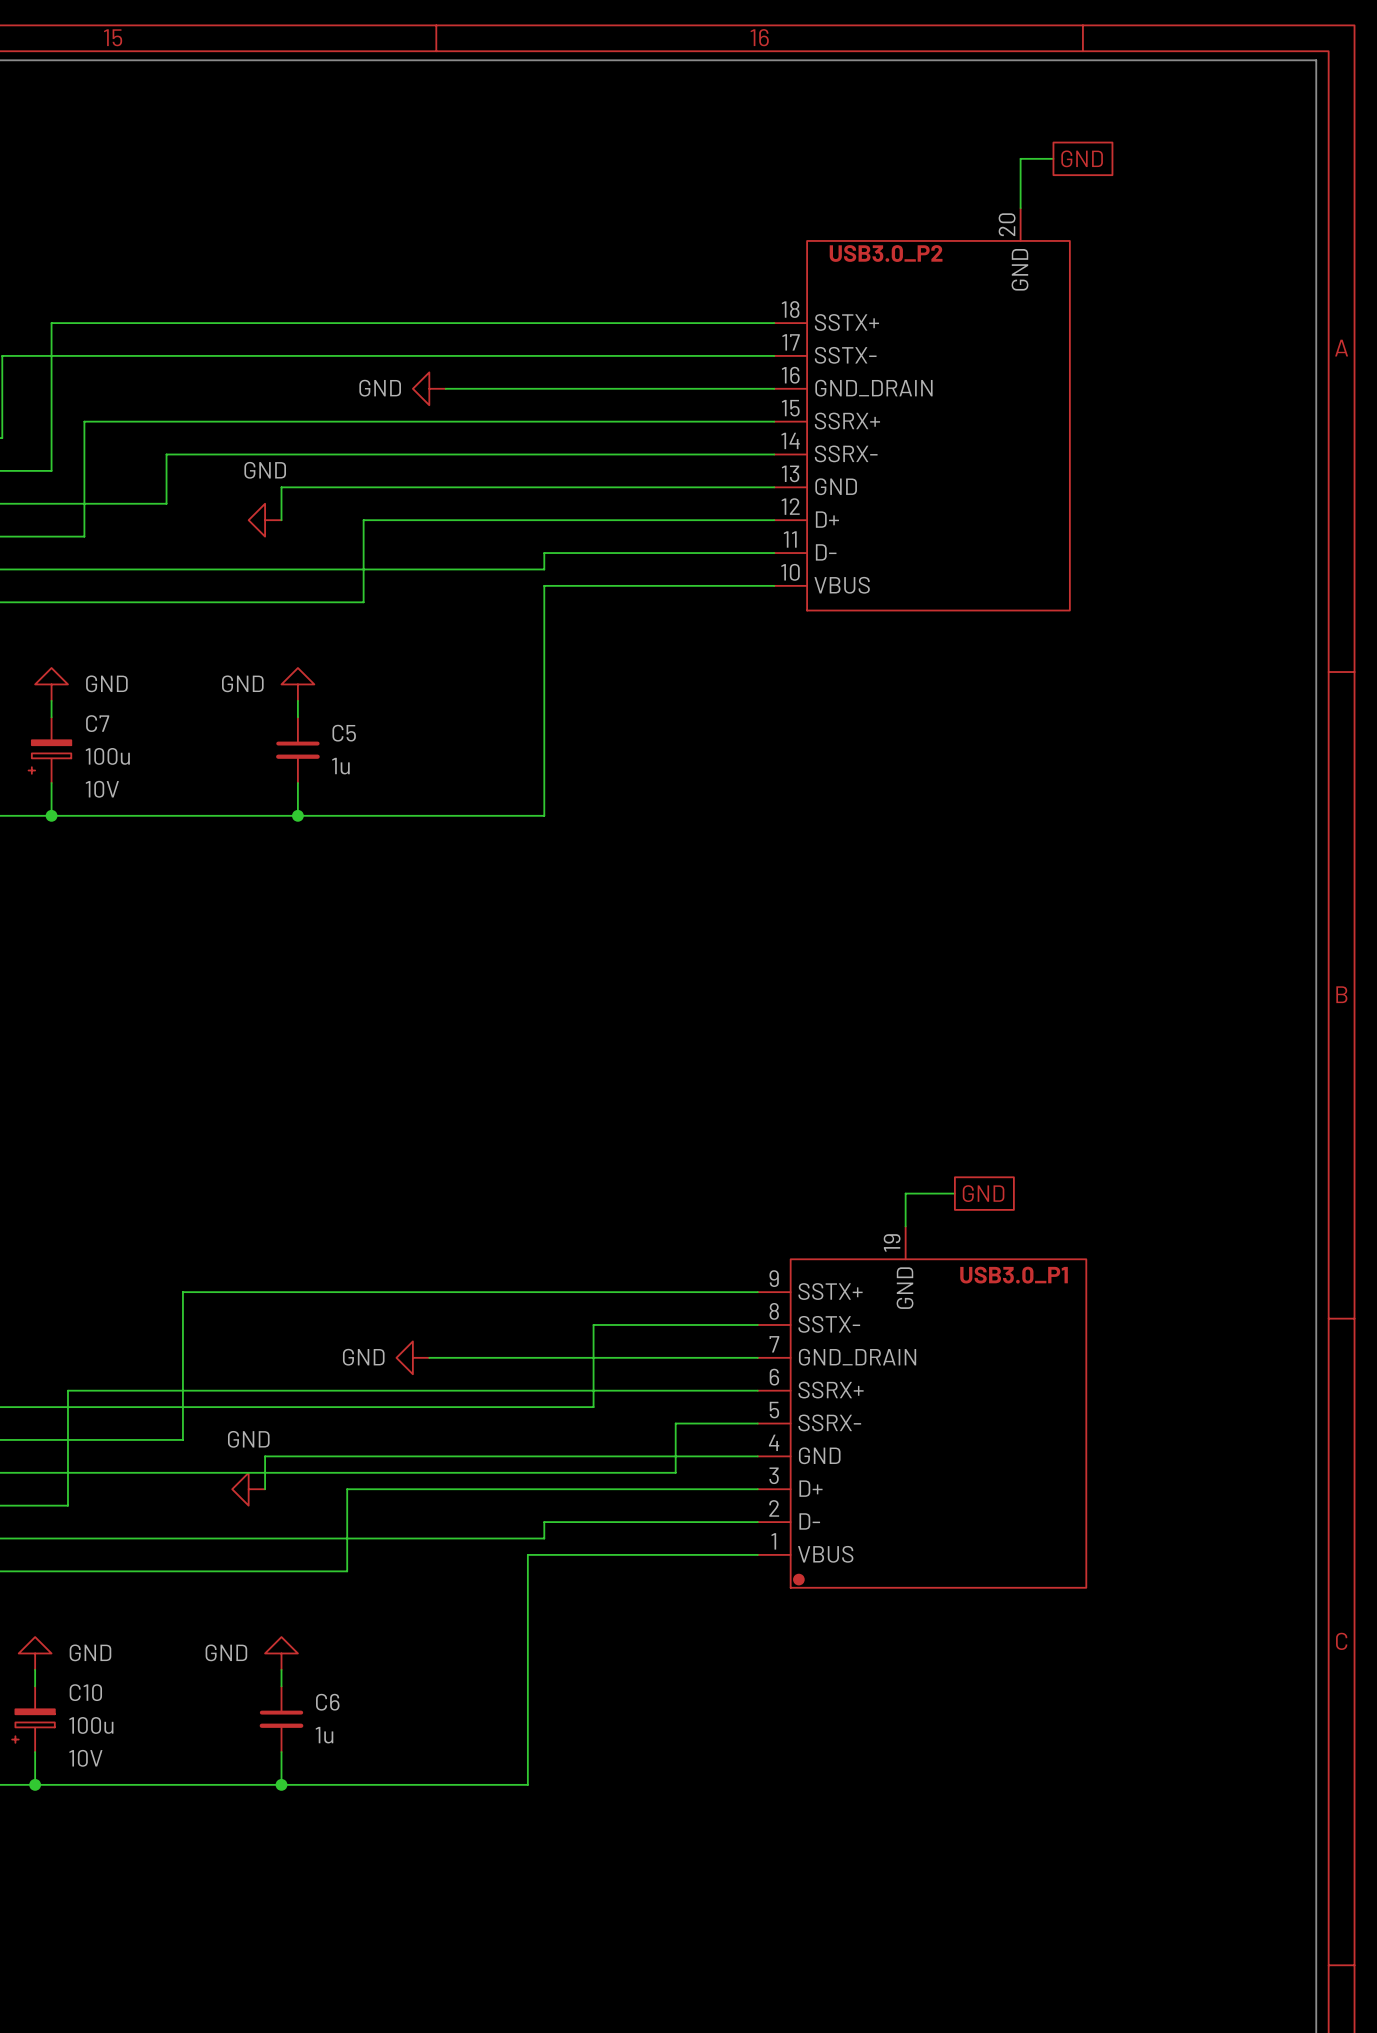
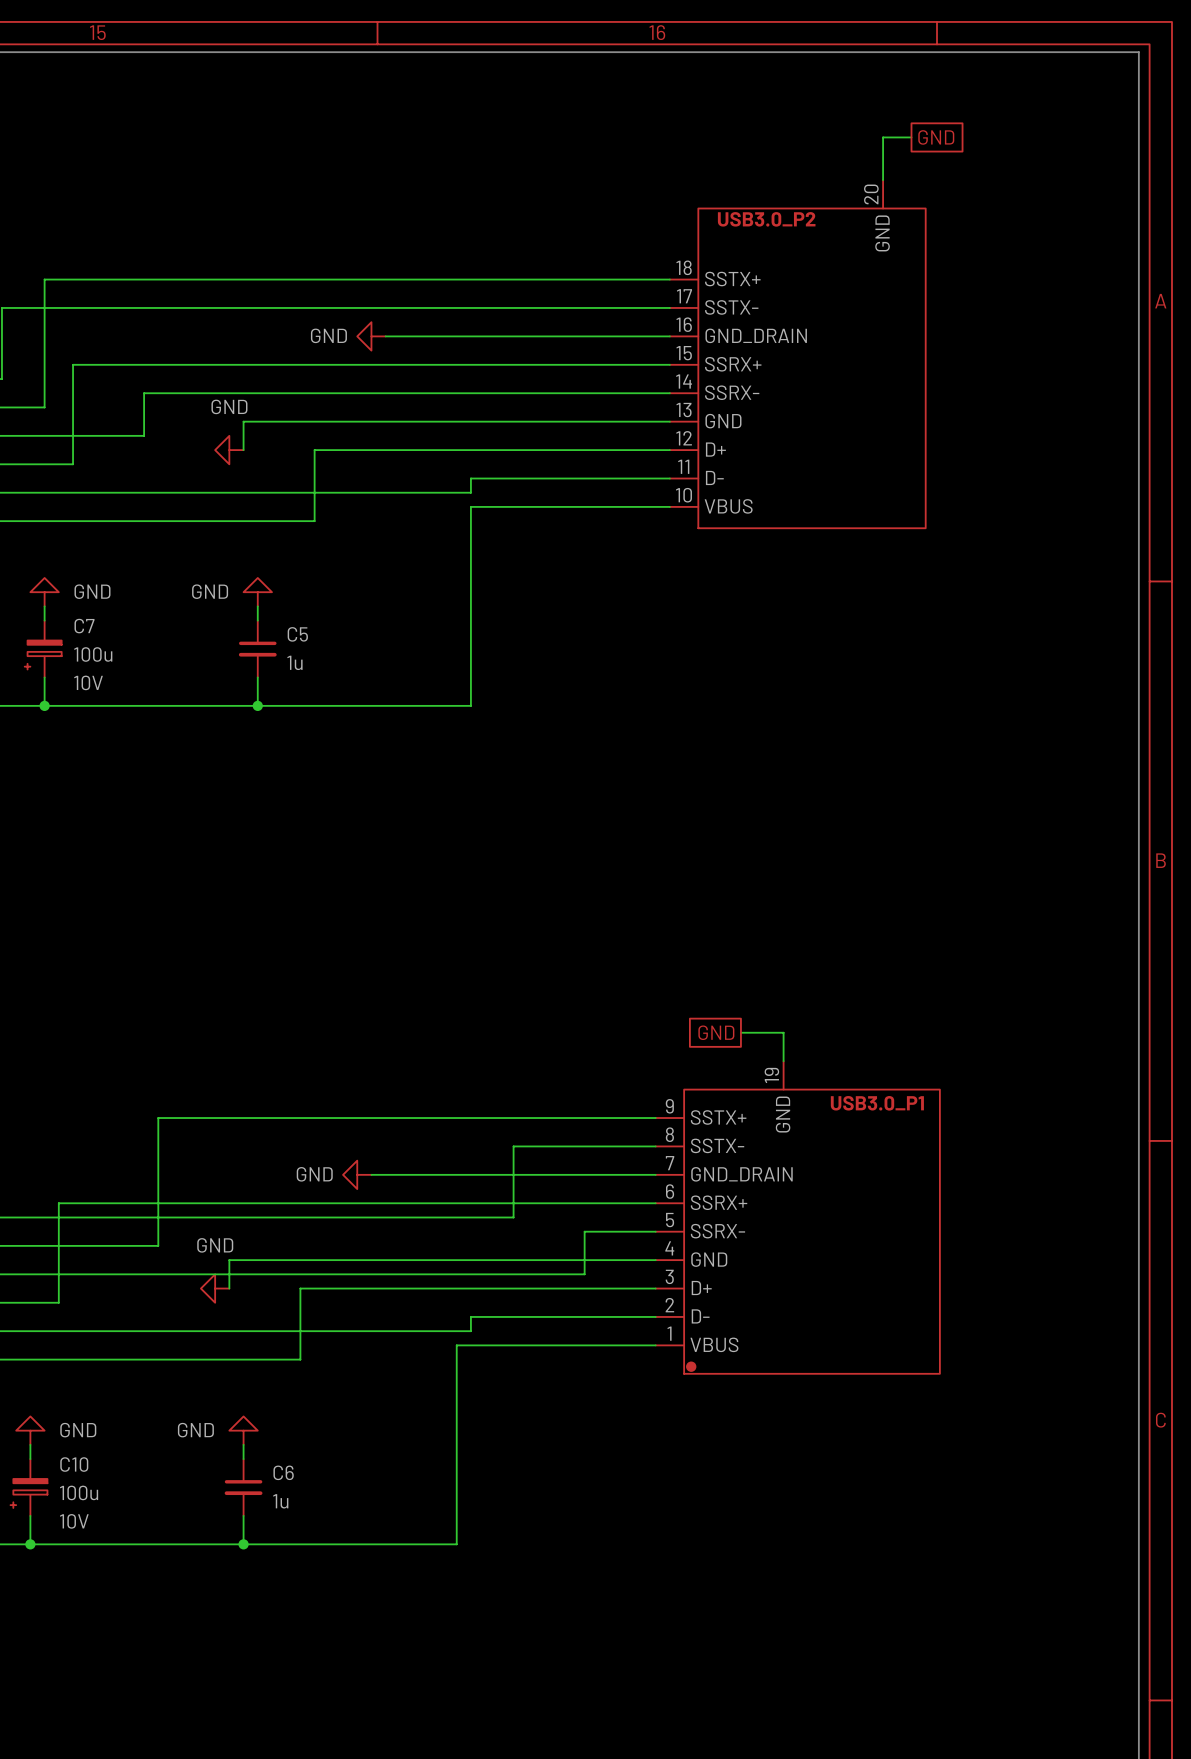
wire: (905, 1193) (954, 1193) -> (783, 1032) (740, 1032)
global label rotation: 0° (983, 1193) -> 180° (716, 1032)
global label position: GND (983, 1193) -> GND (716, 1032)

